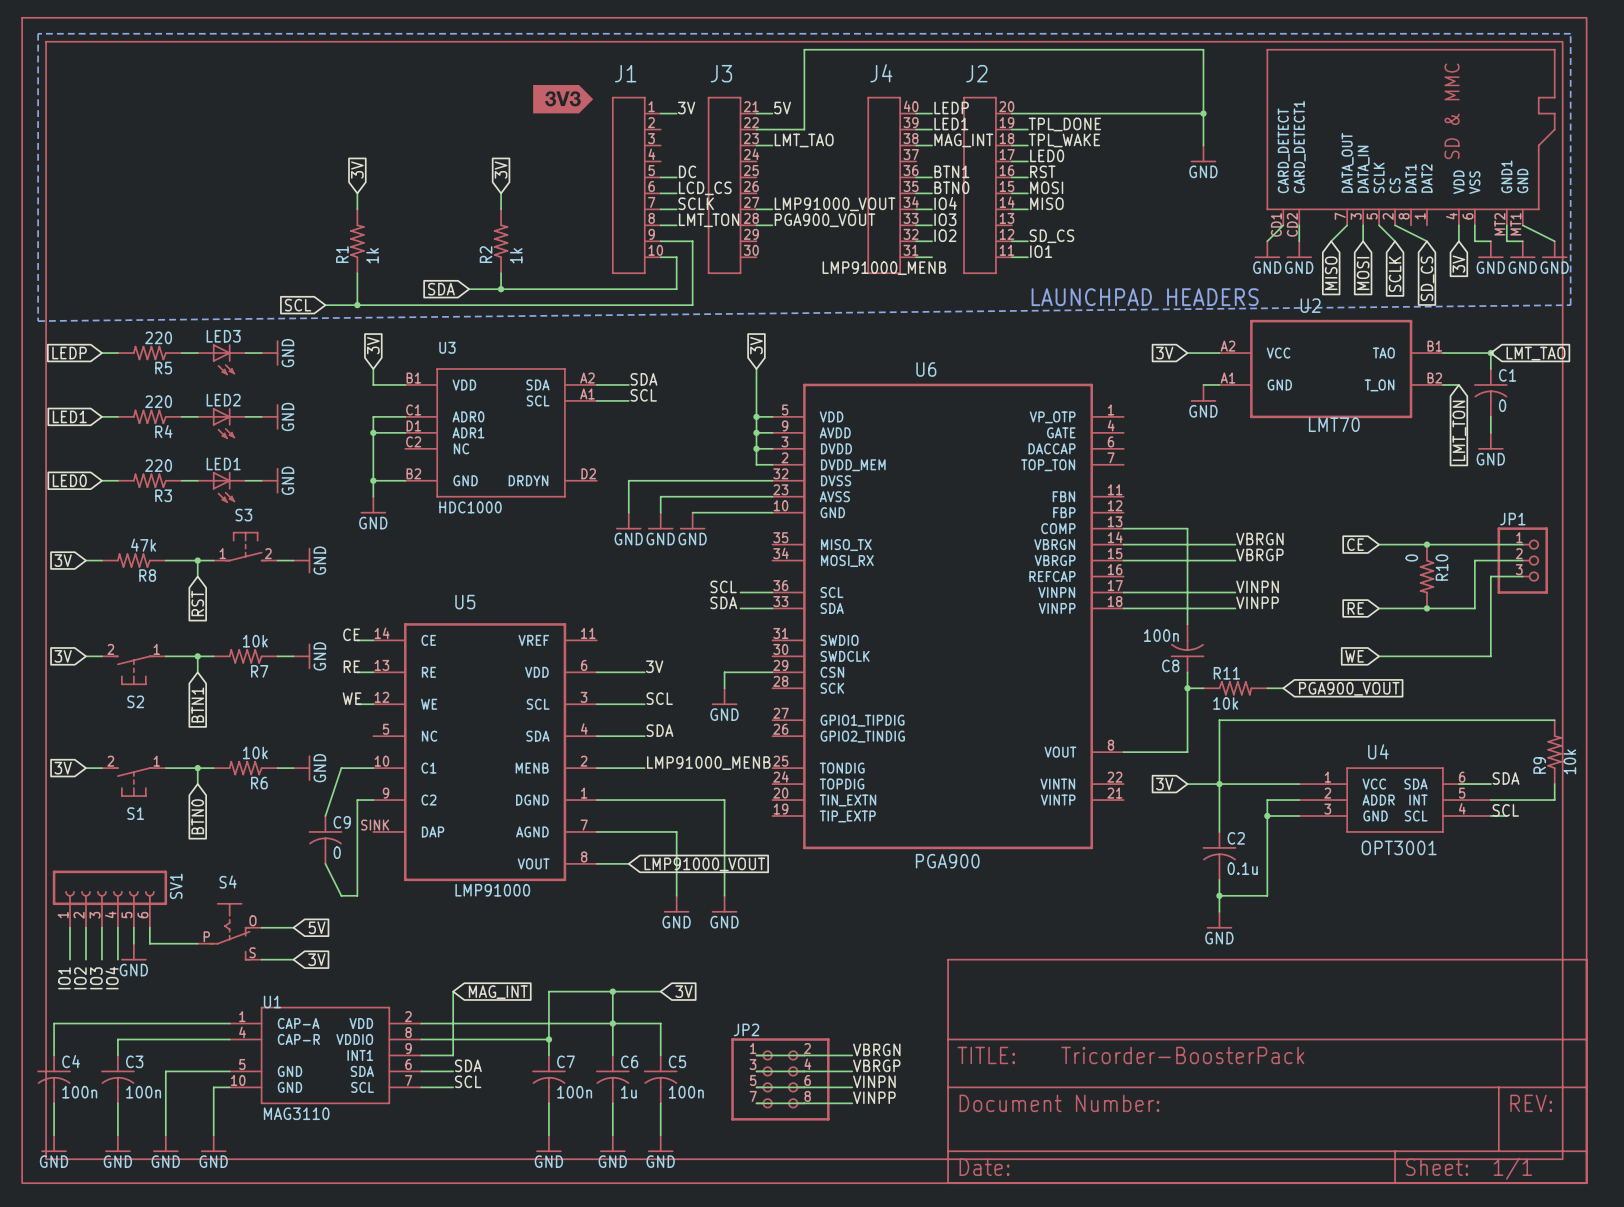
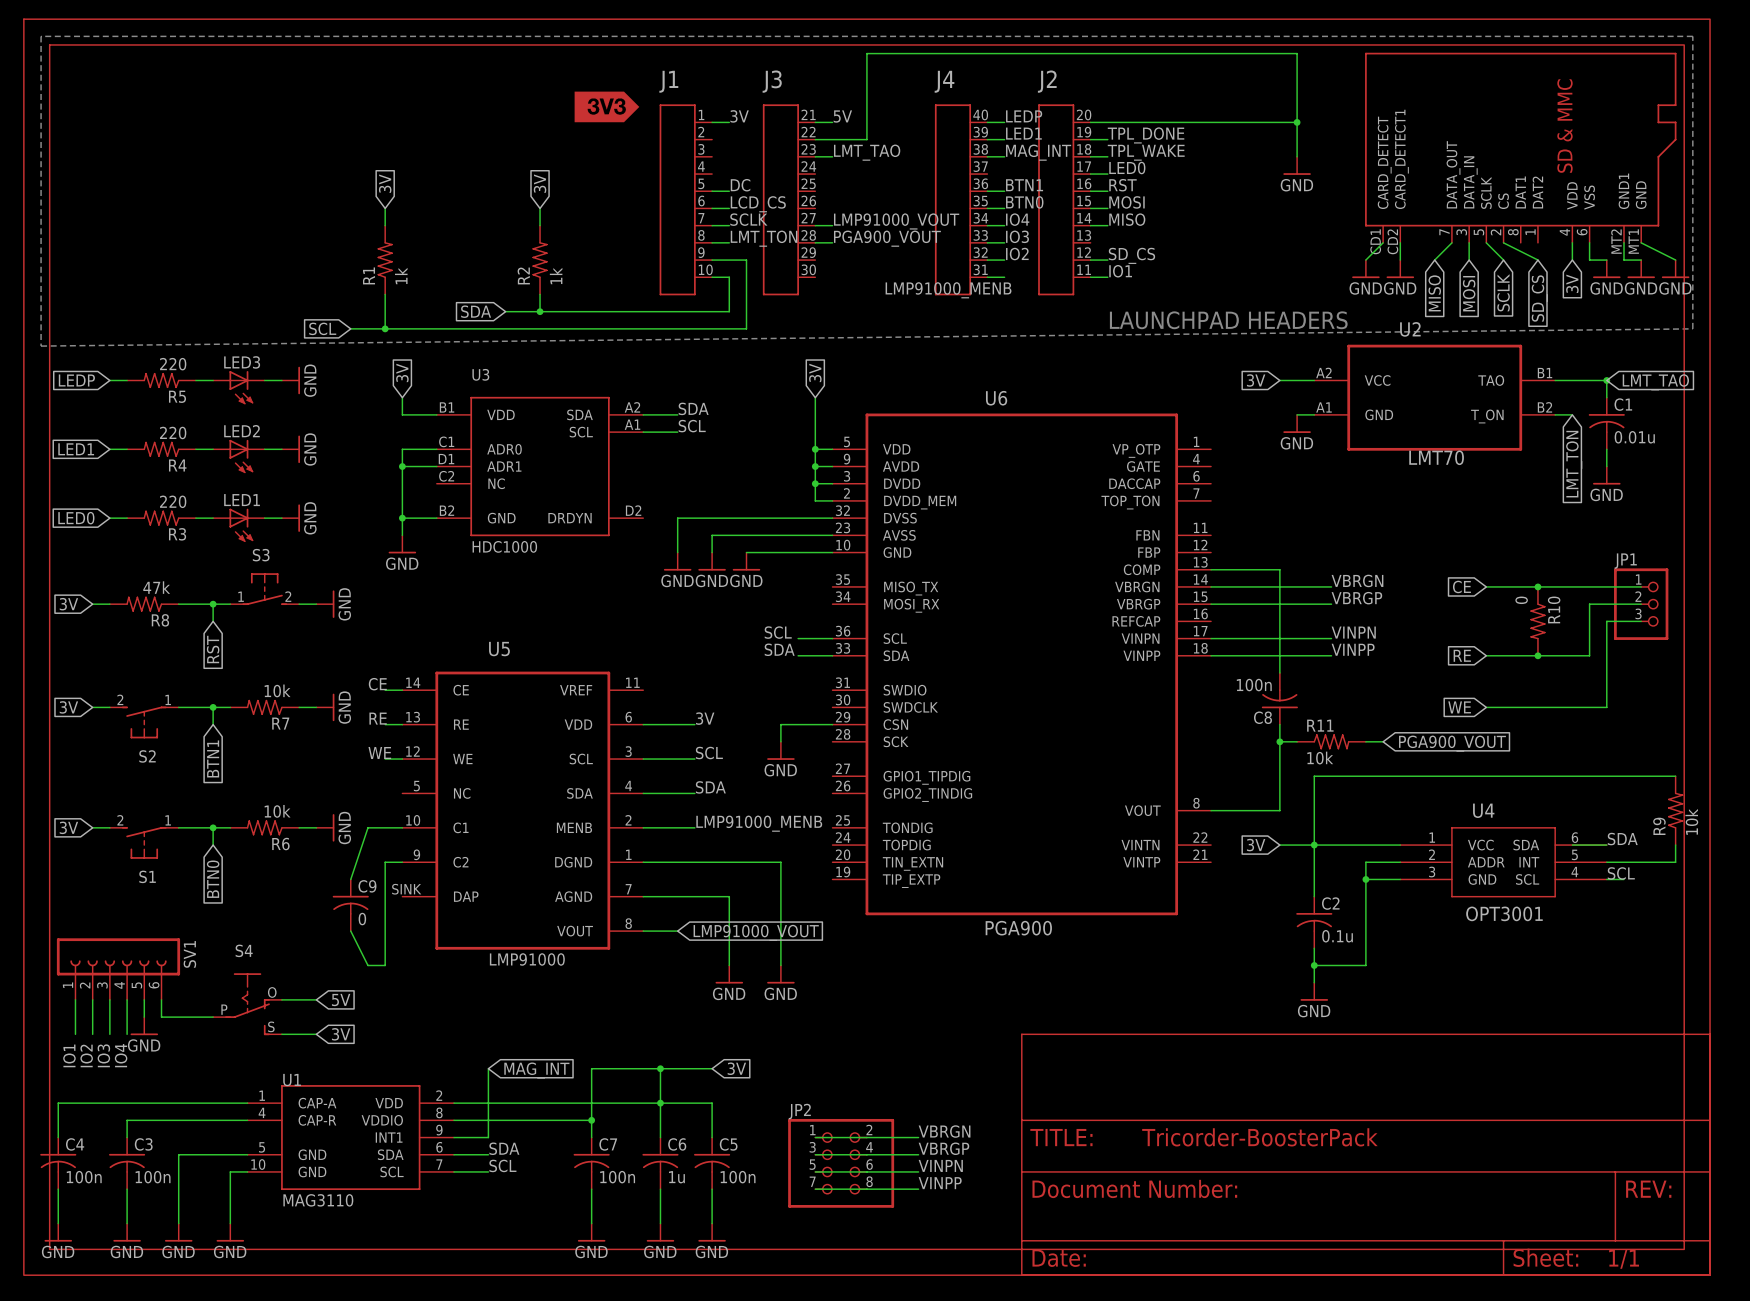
C1 value: 0 (1502, 405) -> 0.01u (1634, 437)

